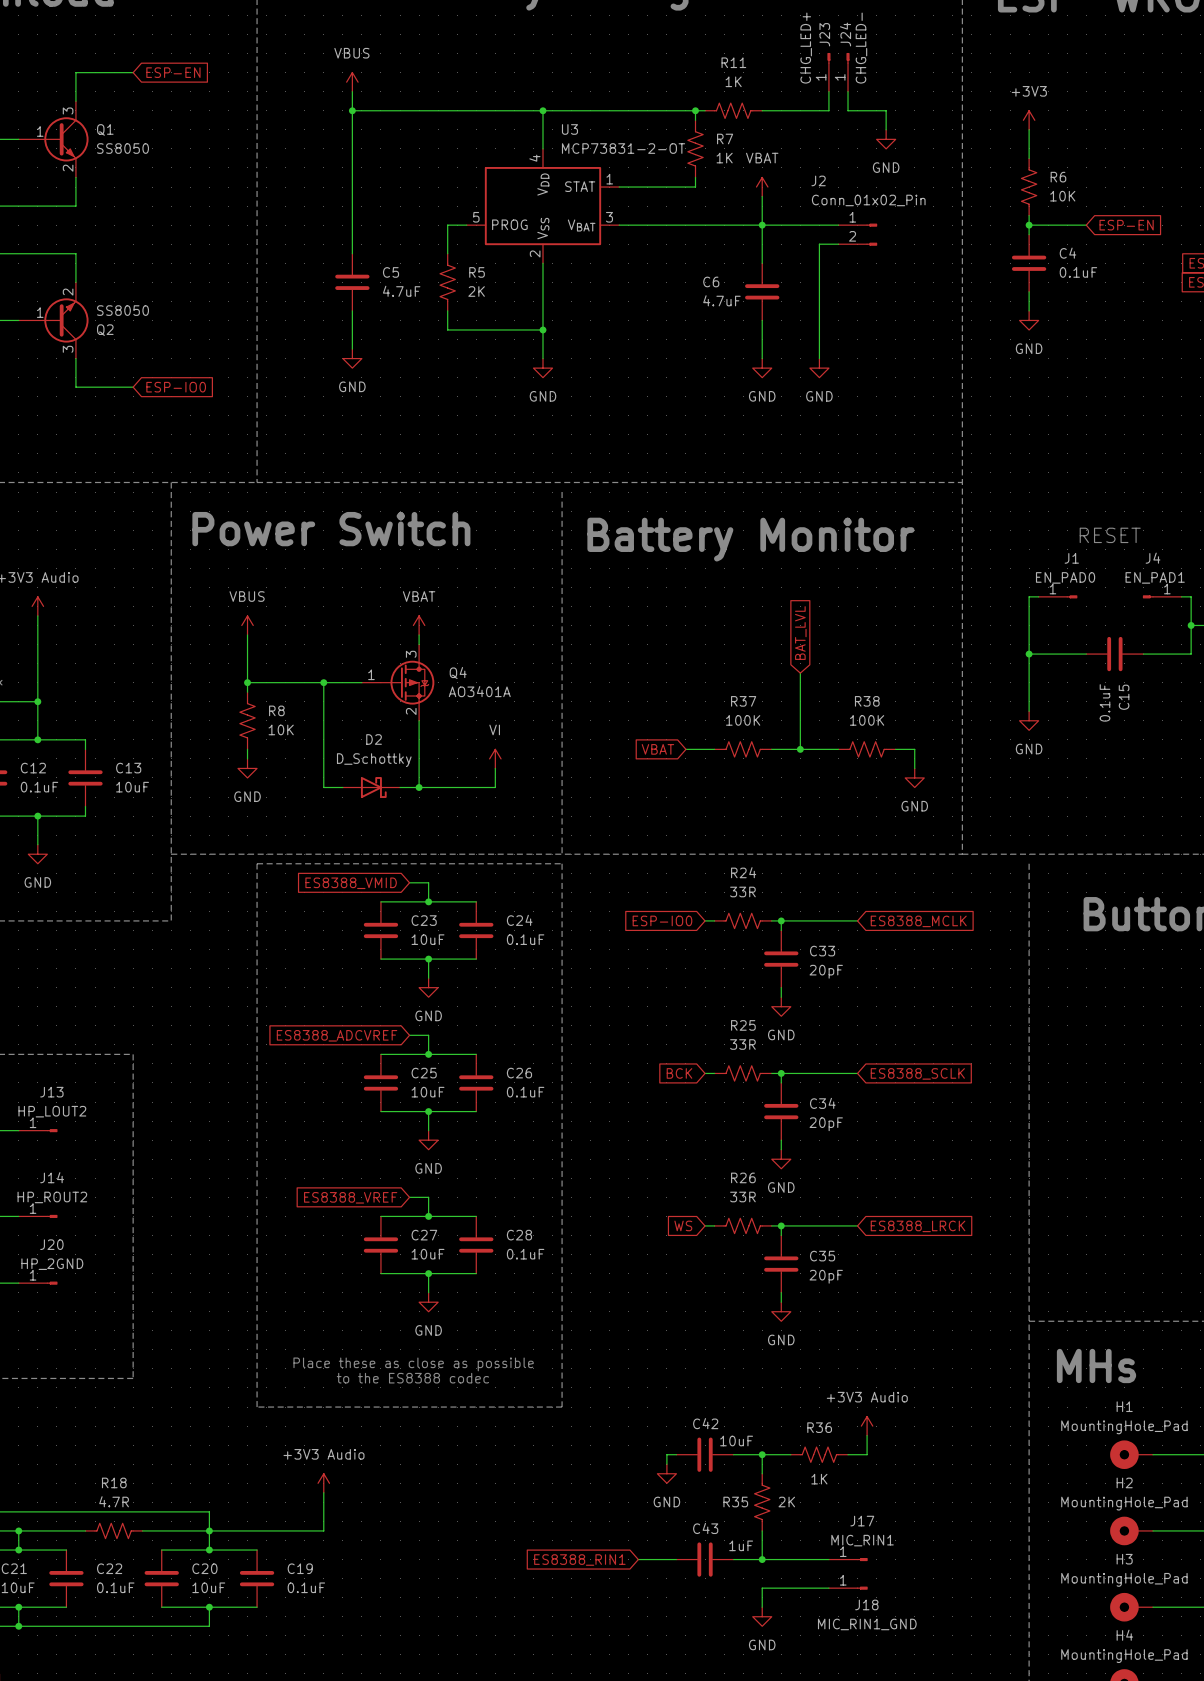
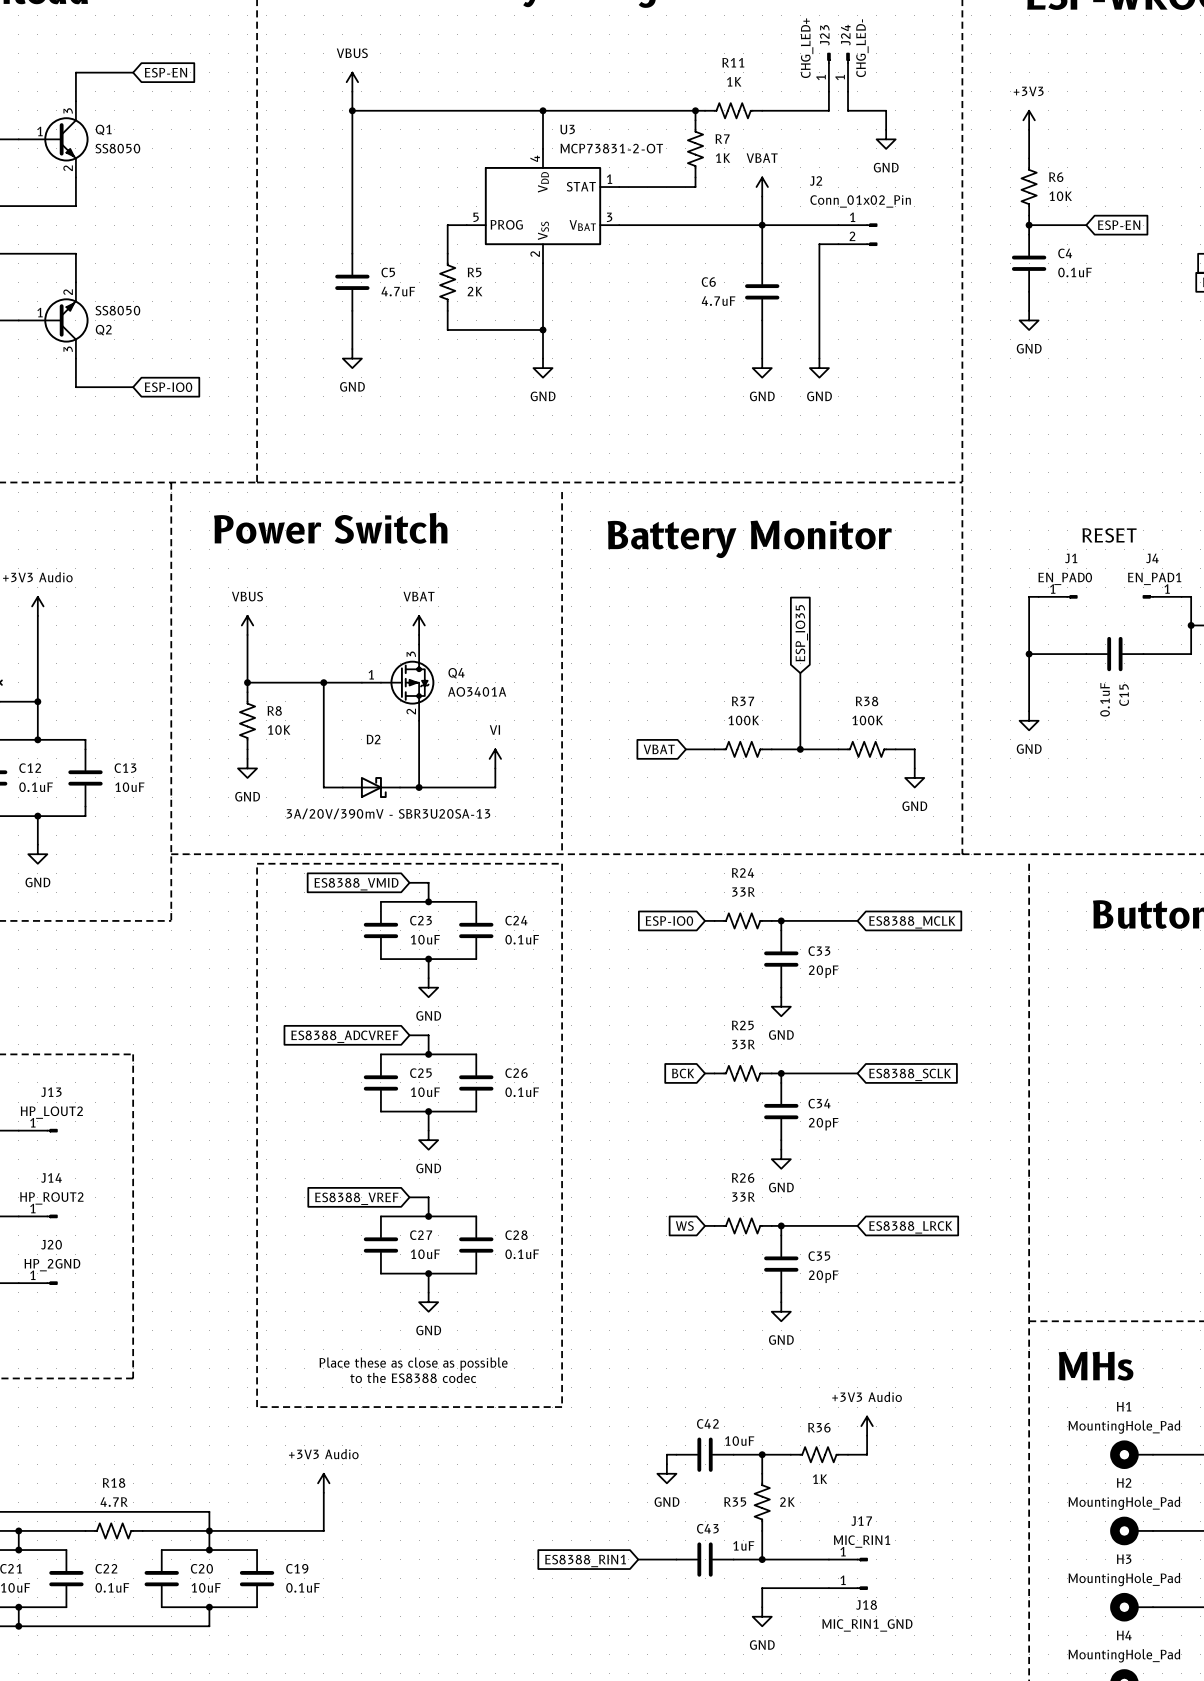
global label: BAT_LVL (800, 633) -> ESP_IO35 (801, 633)
D2 value: D_Schottky (374, 760) -> 3A/20V/390mV - SBR3U20SA-13 (388, 813)

